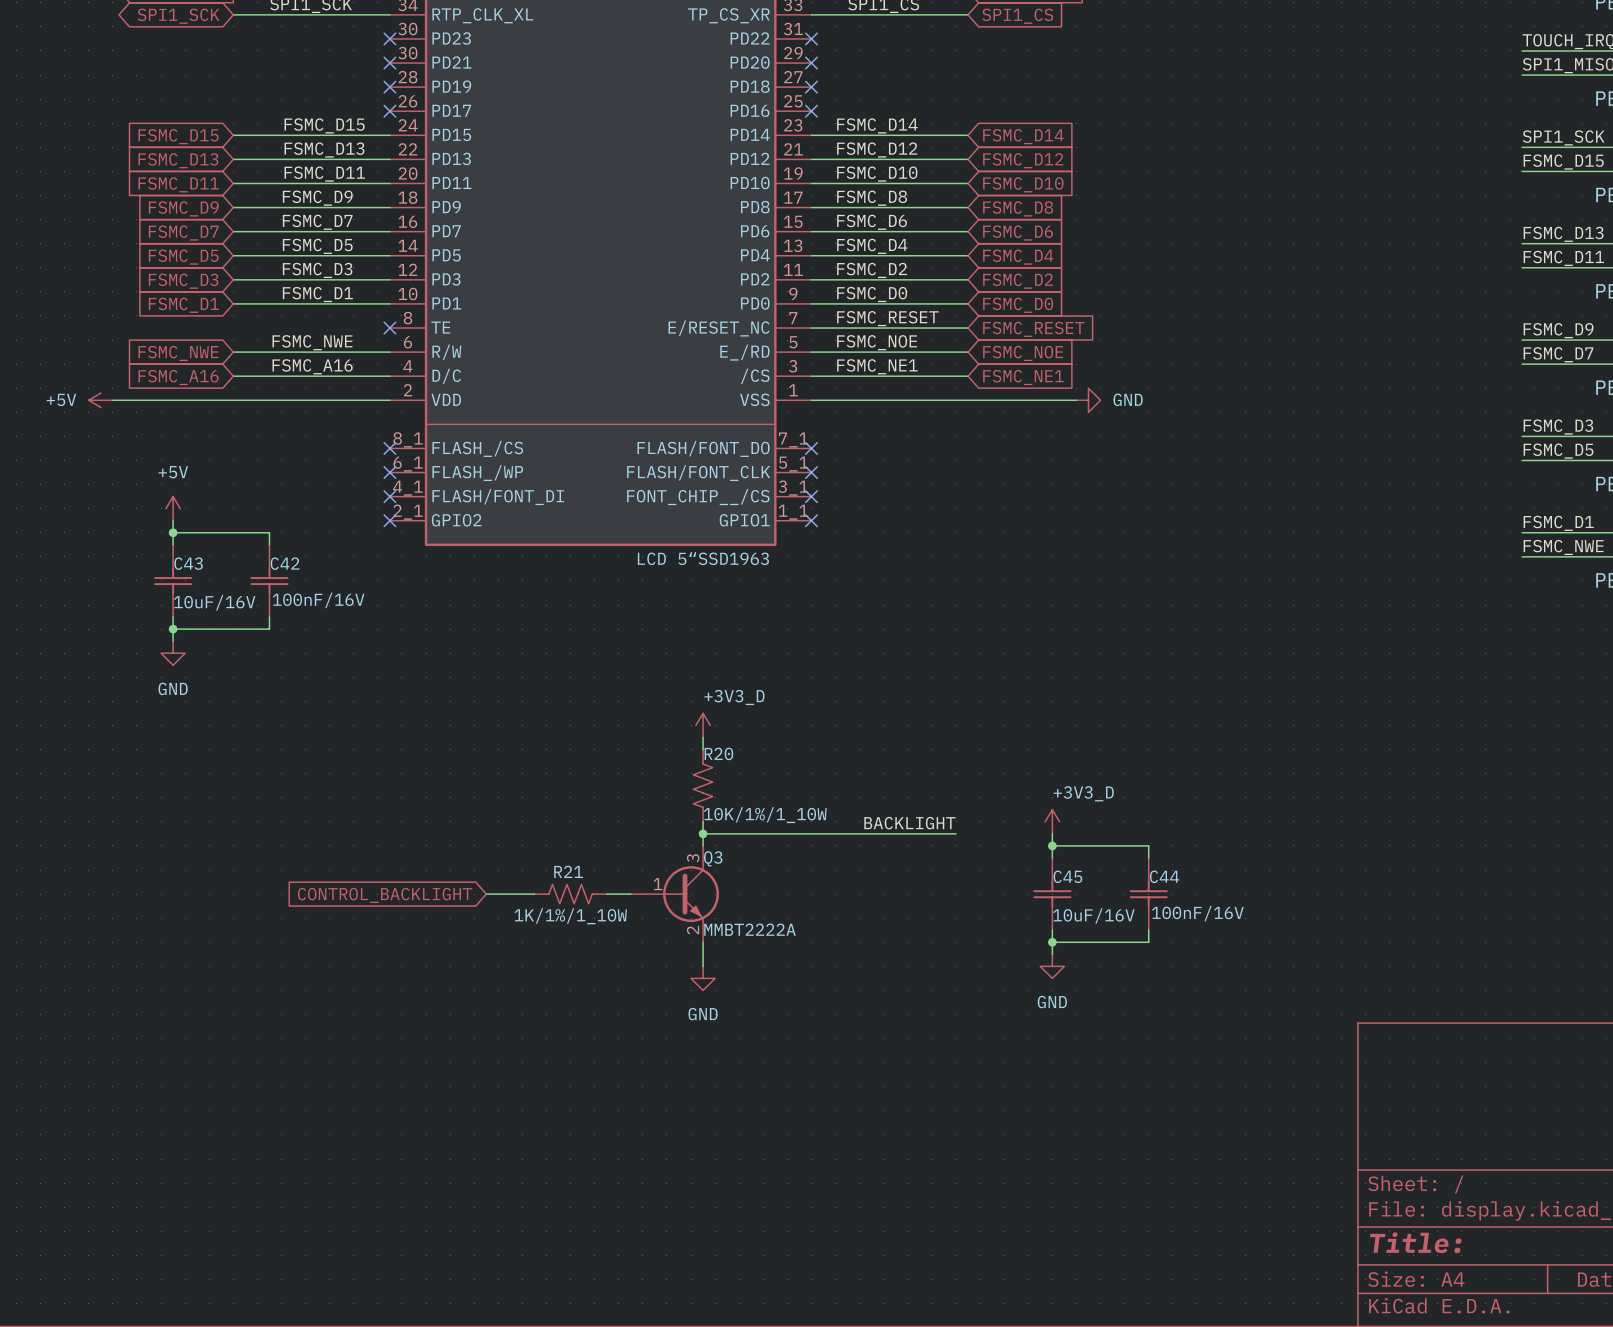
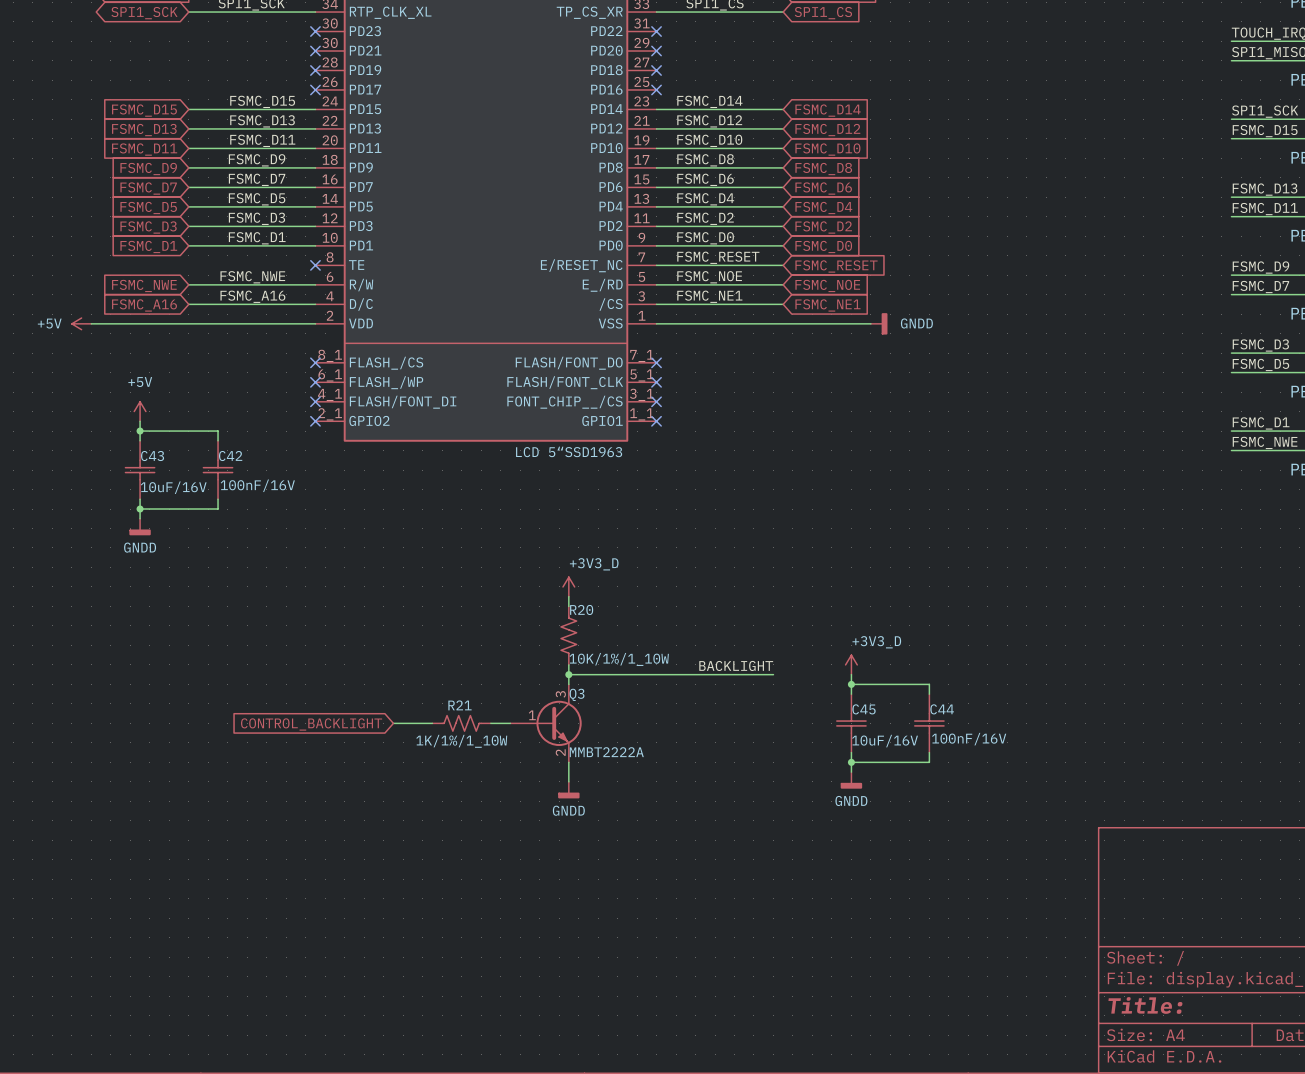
power symbol: GND (1088, 400) -> GNDD (879, 323)
power symbol: GND (173, 653) -> GNDD (140, 527)
power symbol: GND (1052, 966) -> GNDD (851, 780)
power symbol: GND (703, 978) -> GNDD (568, 790)

